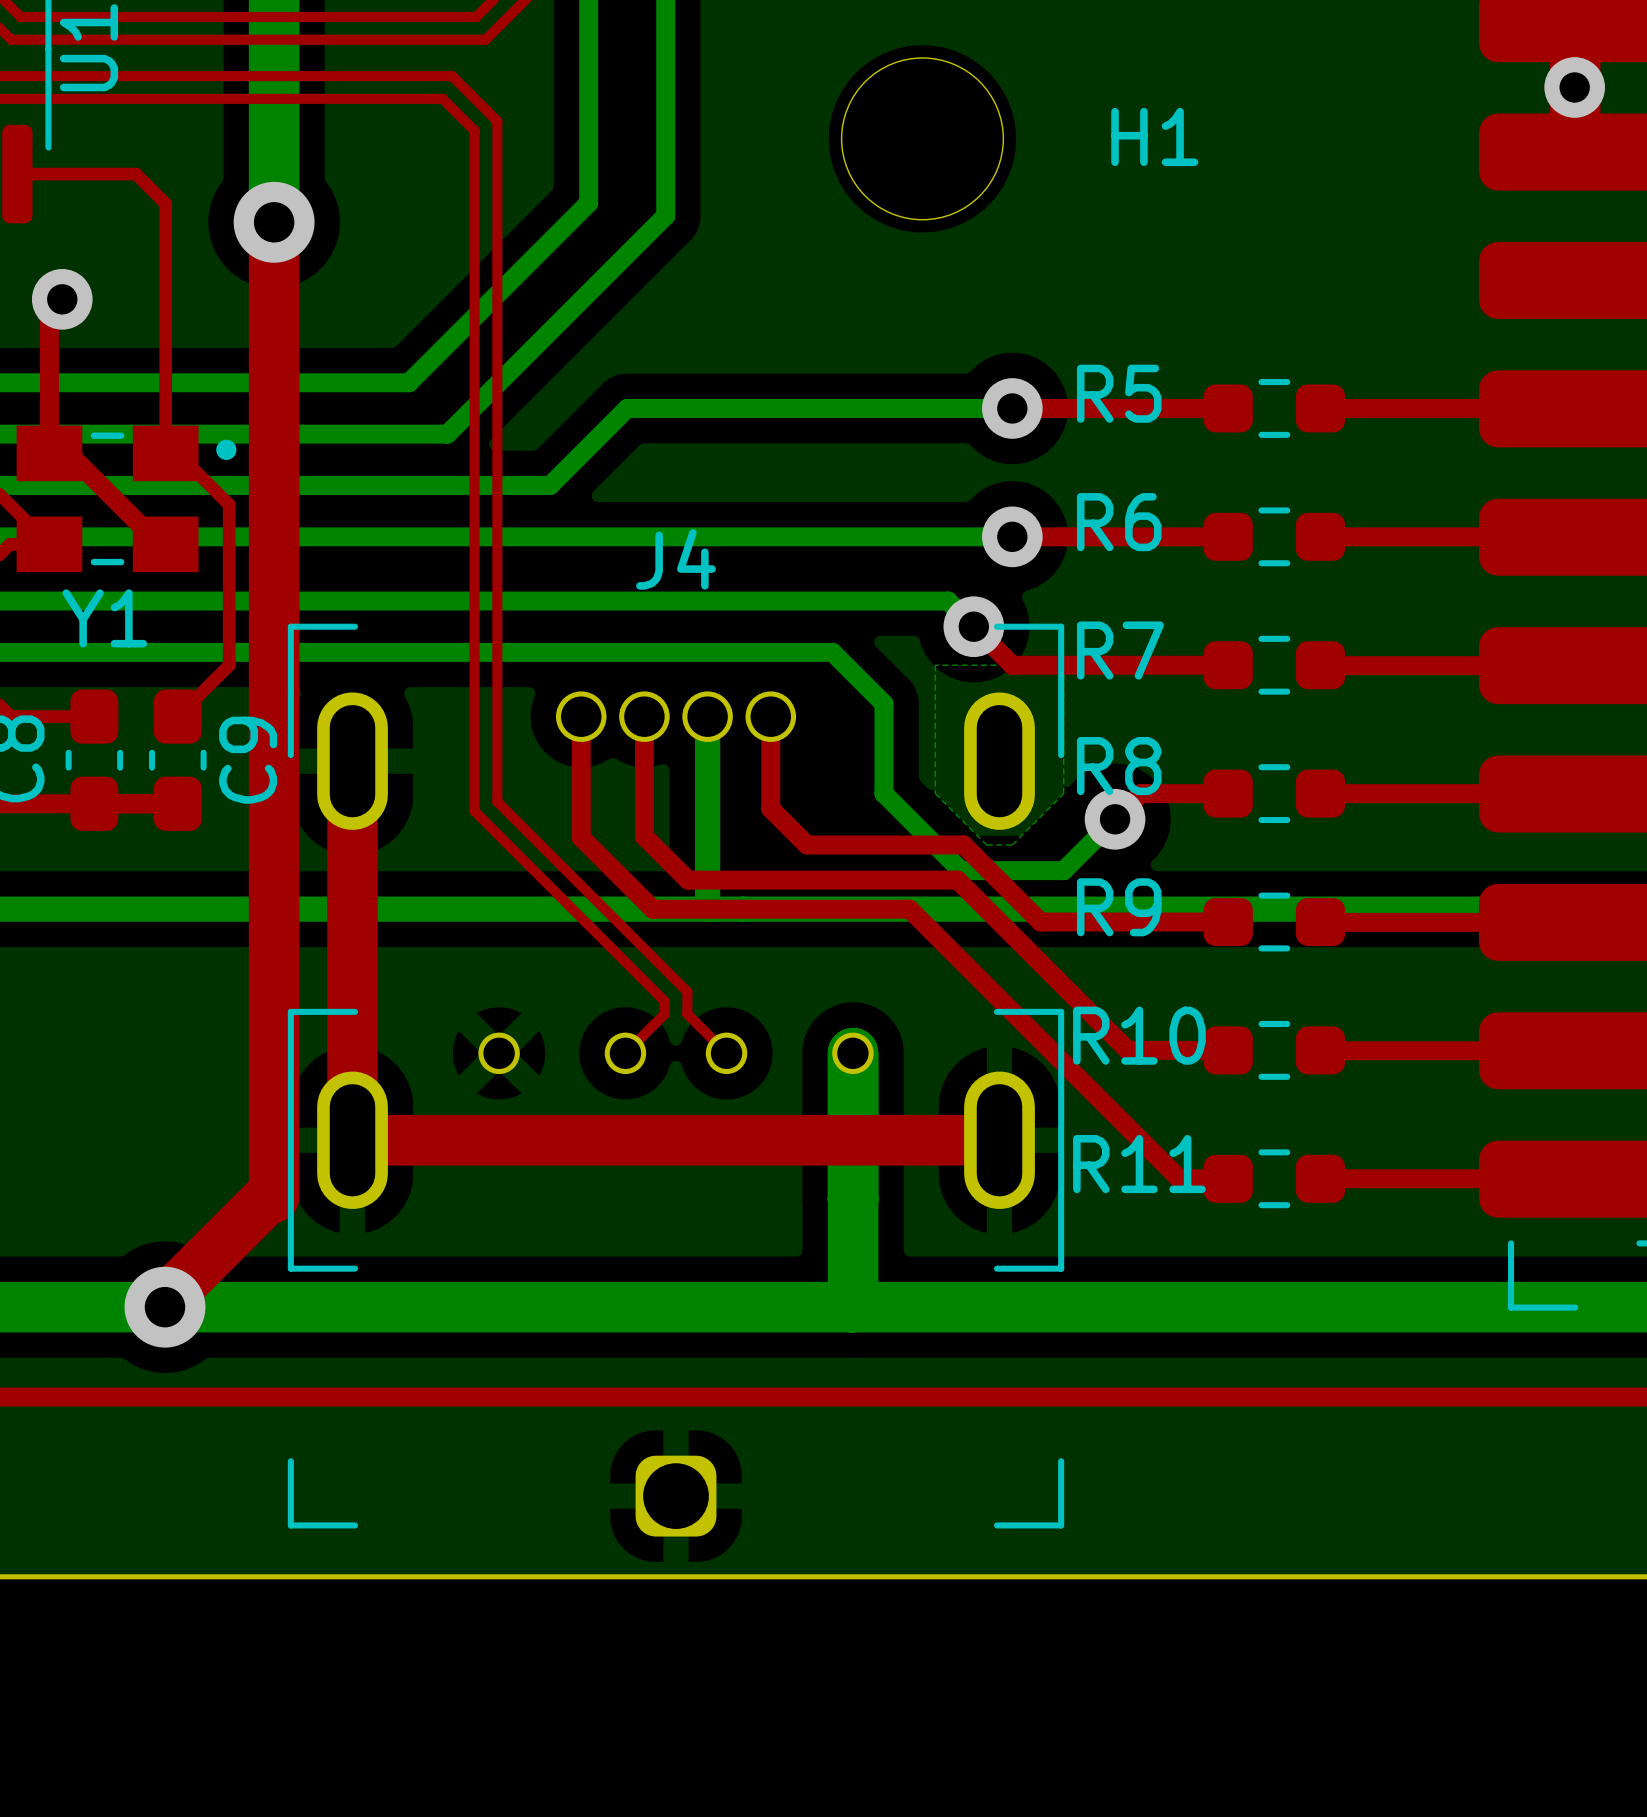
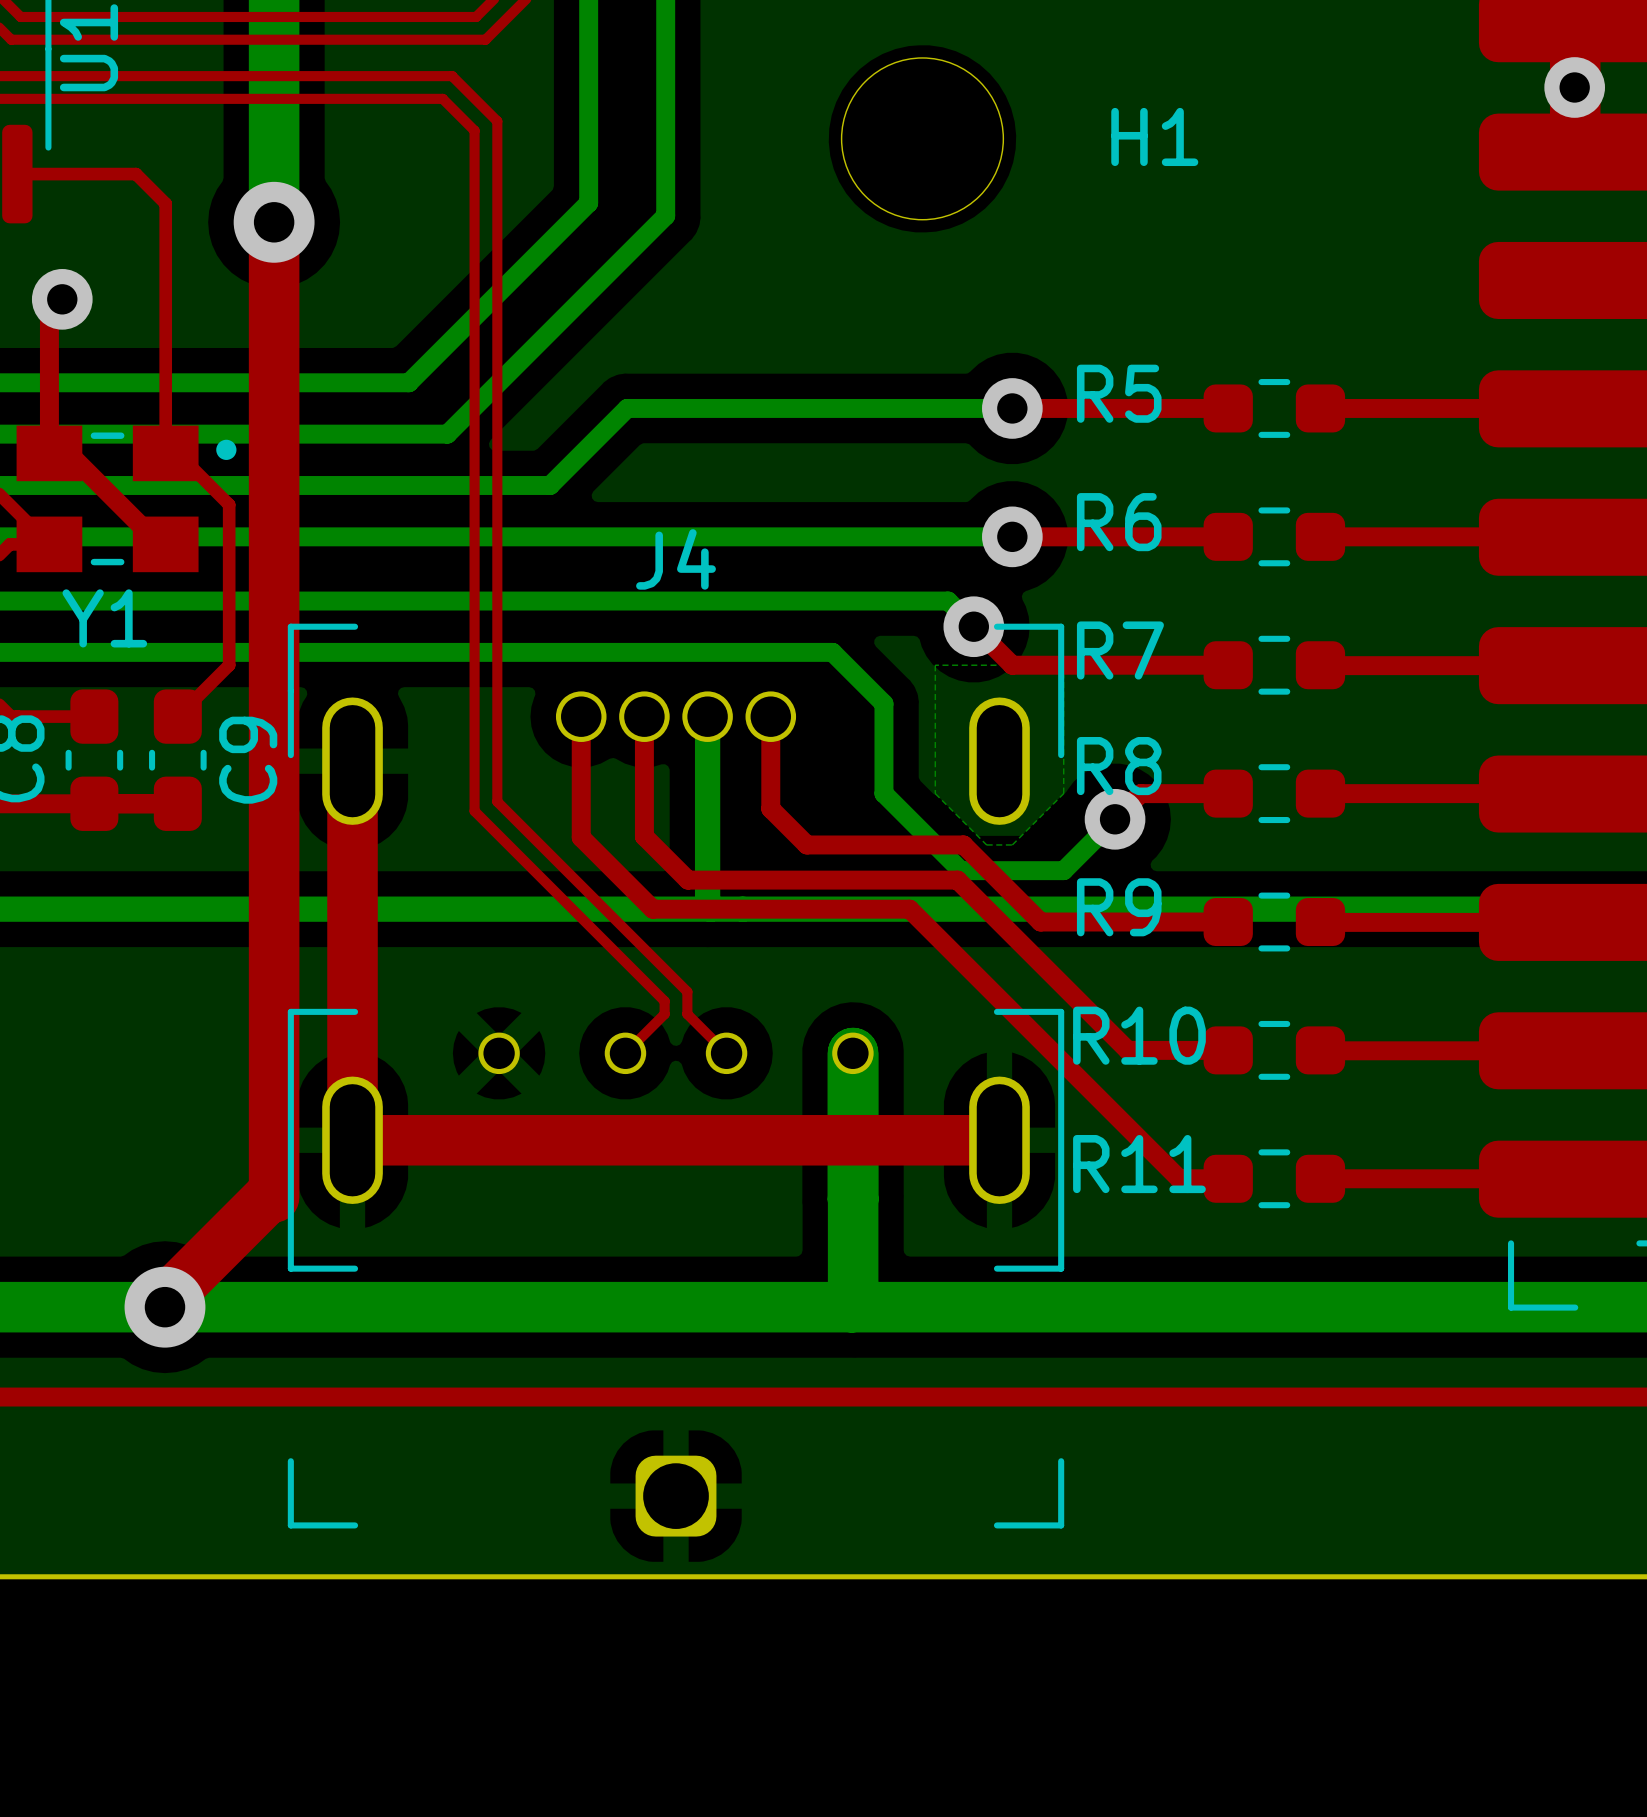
J4 footprint: [287, 623, 1065, 1537] -> [287, 623, 1065, 1537]

